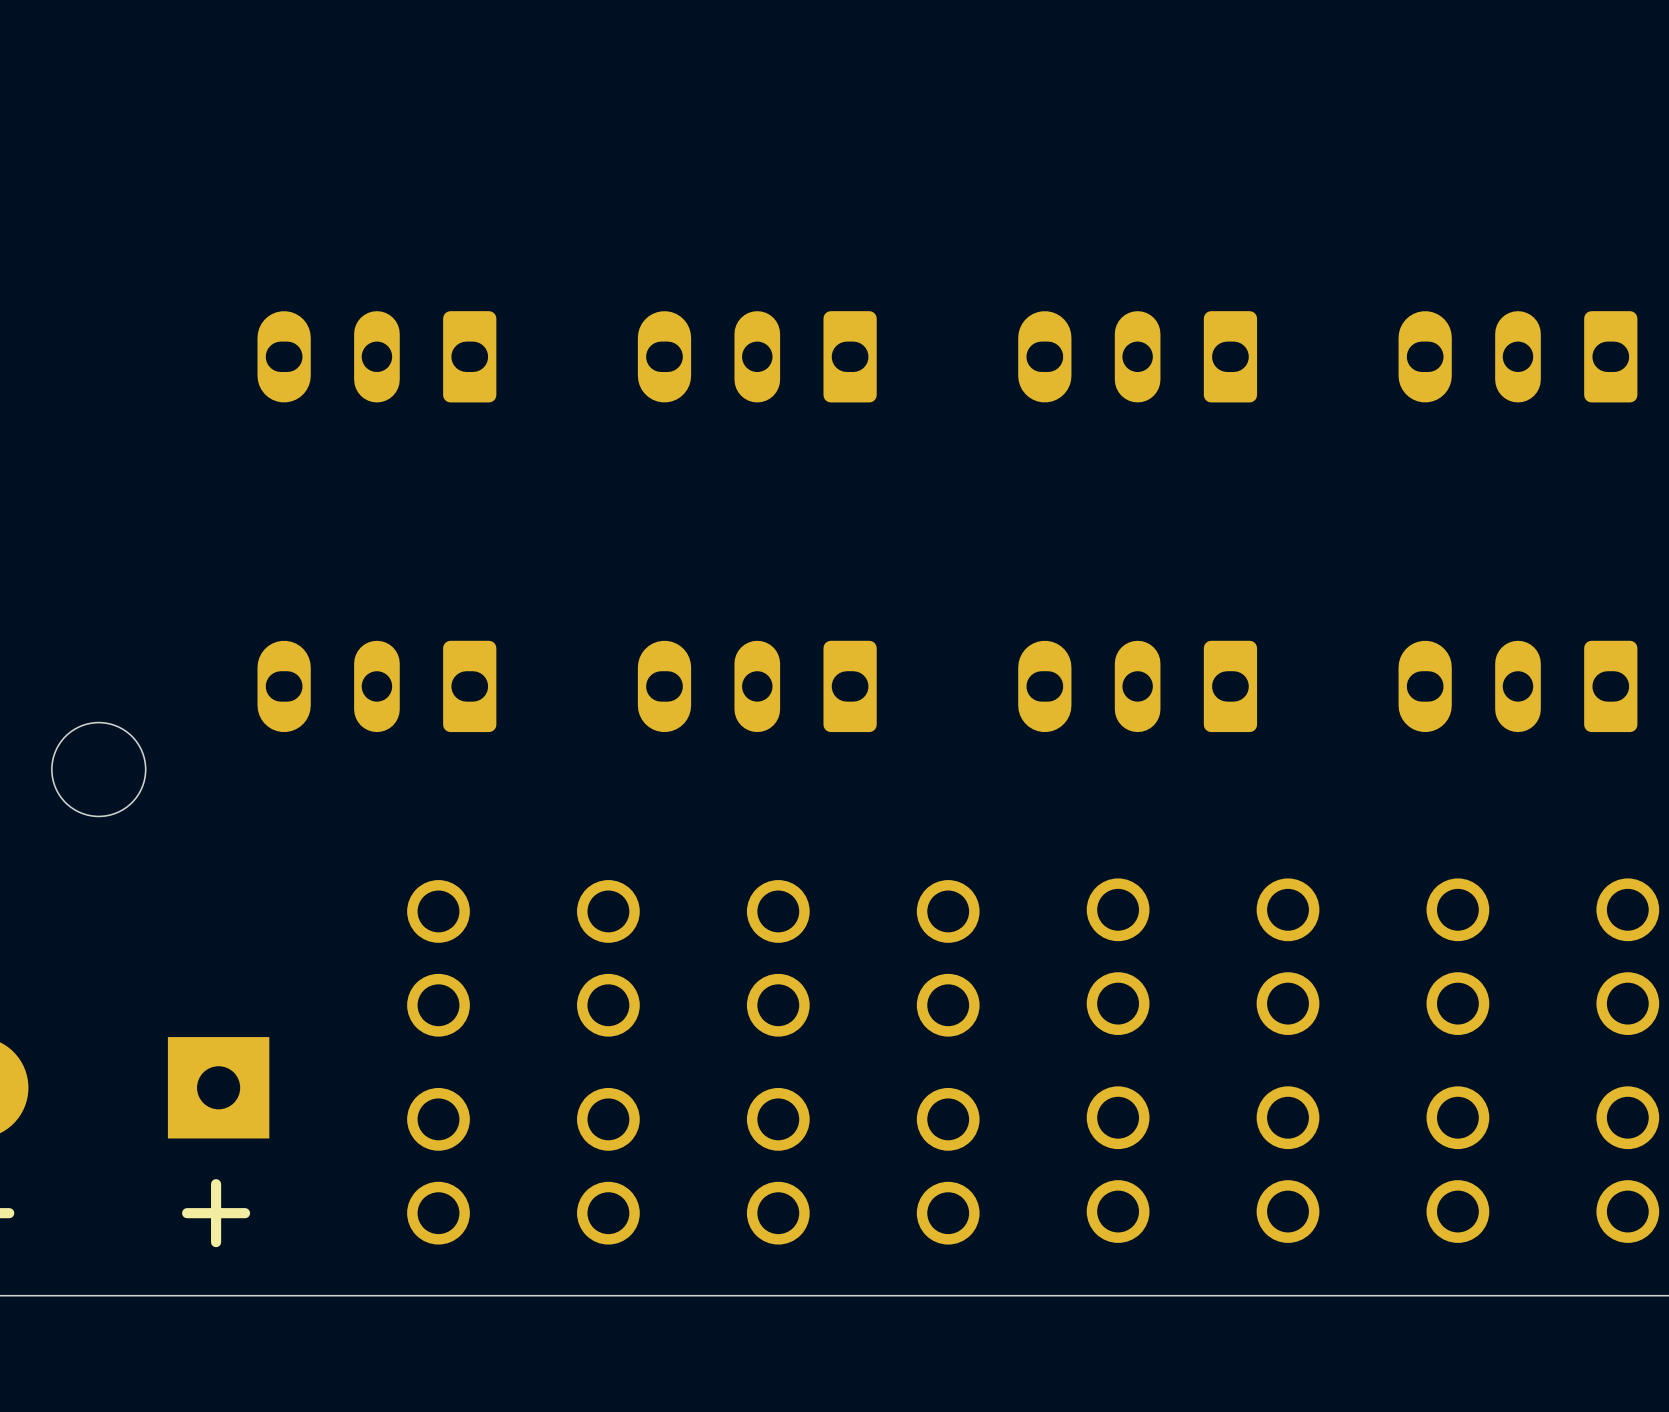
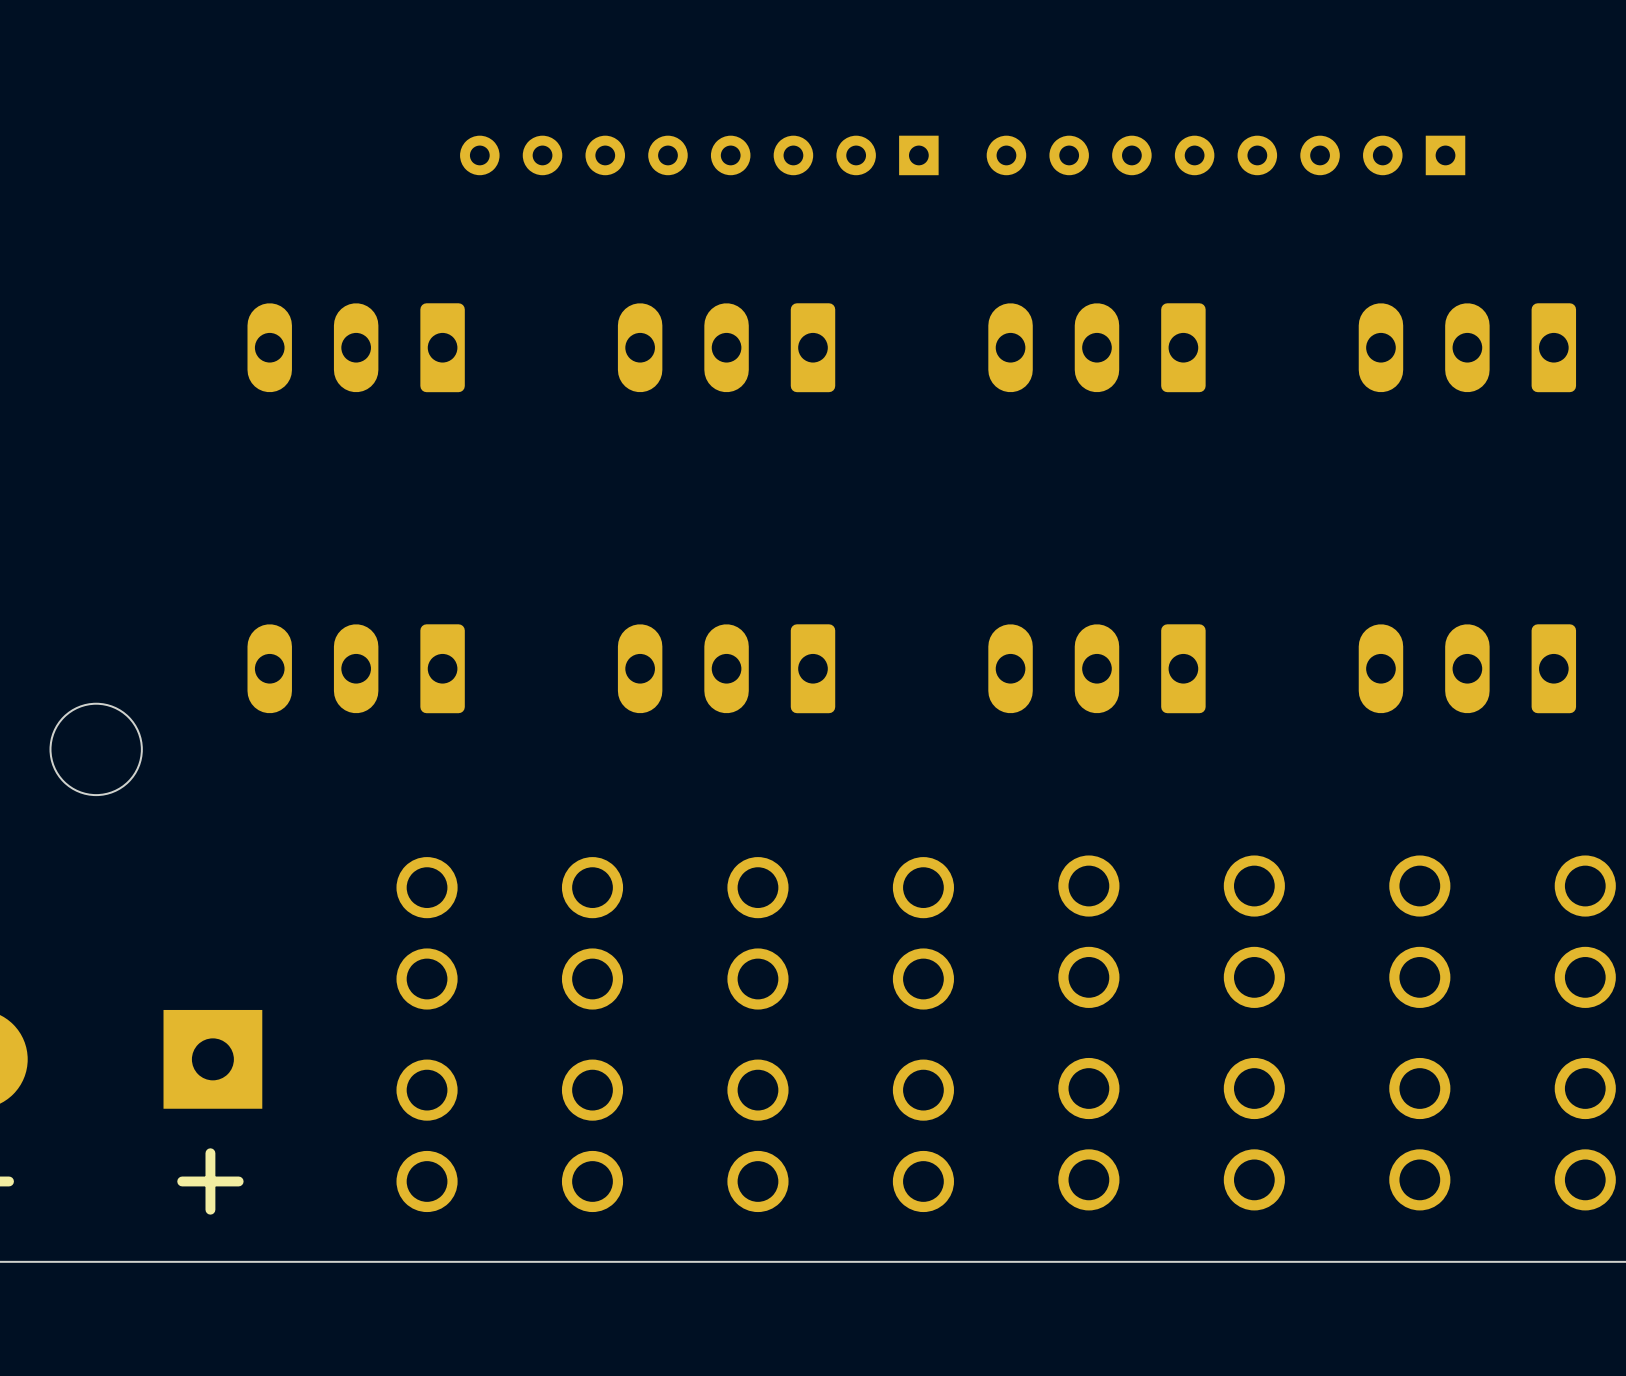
part: none -> (699, 155)
part: none -> (1225, 155)
part footprint: [257, 311, 497, 403] -> [247, 303, 465, 393]
part footprint: [637, 311, 877, 403] -> [617, 303, 836, 393]
part footprint: [1018, 311, 1258, 403] -> [988, 303, 1206, 393]
part footprint: [1398, 311, 1638, 403] -> [1358, 303, 1577, 393]
part footprint: [257, 640, 497, 733] -> [247, 624, 465, 714]
part footprint: [637, 640, 877, 733] -> [617, 624, 836, 714]
part footprint: [1018, 640, 1258, 733] -> [988, 624, 1206, 714]
part footprint: [1398, 640, 1638, 733] -> [1358, 624, 1577, 714]

